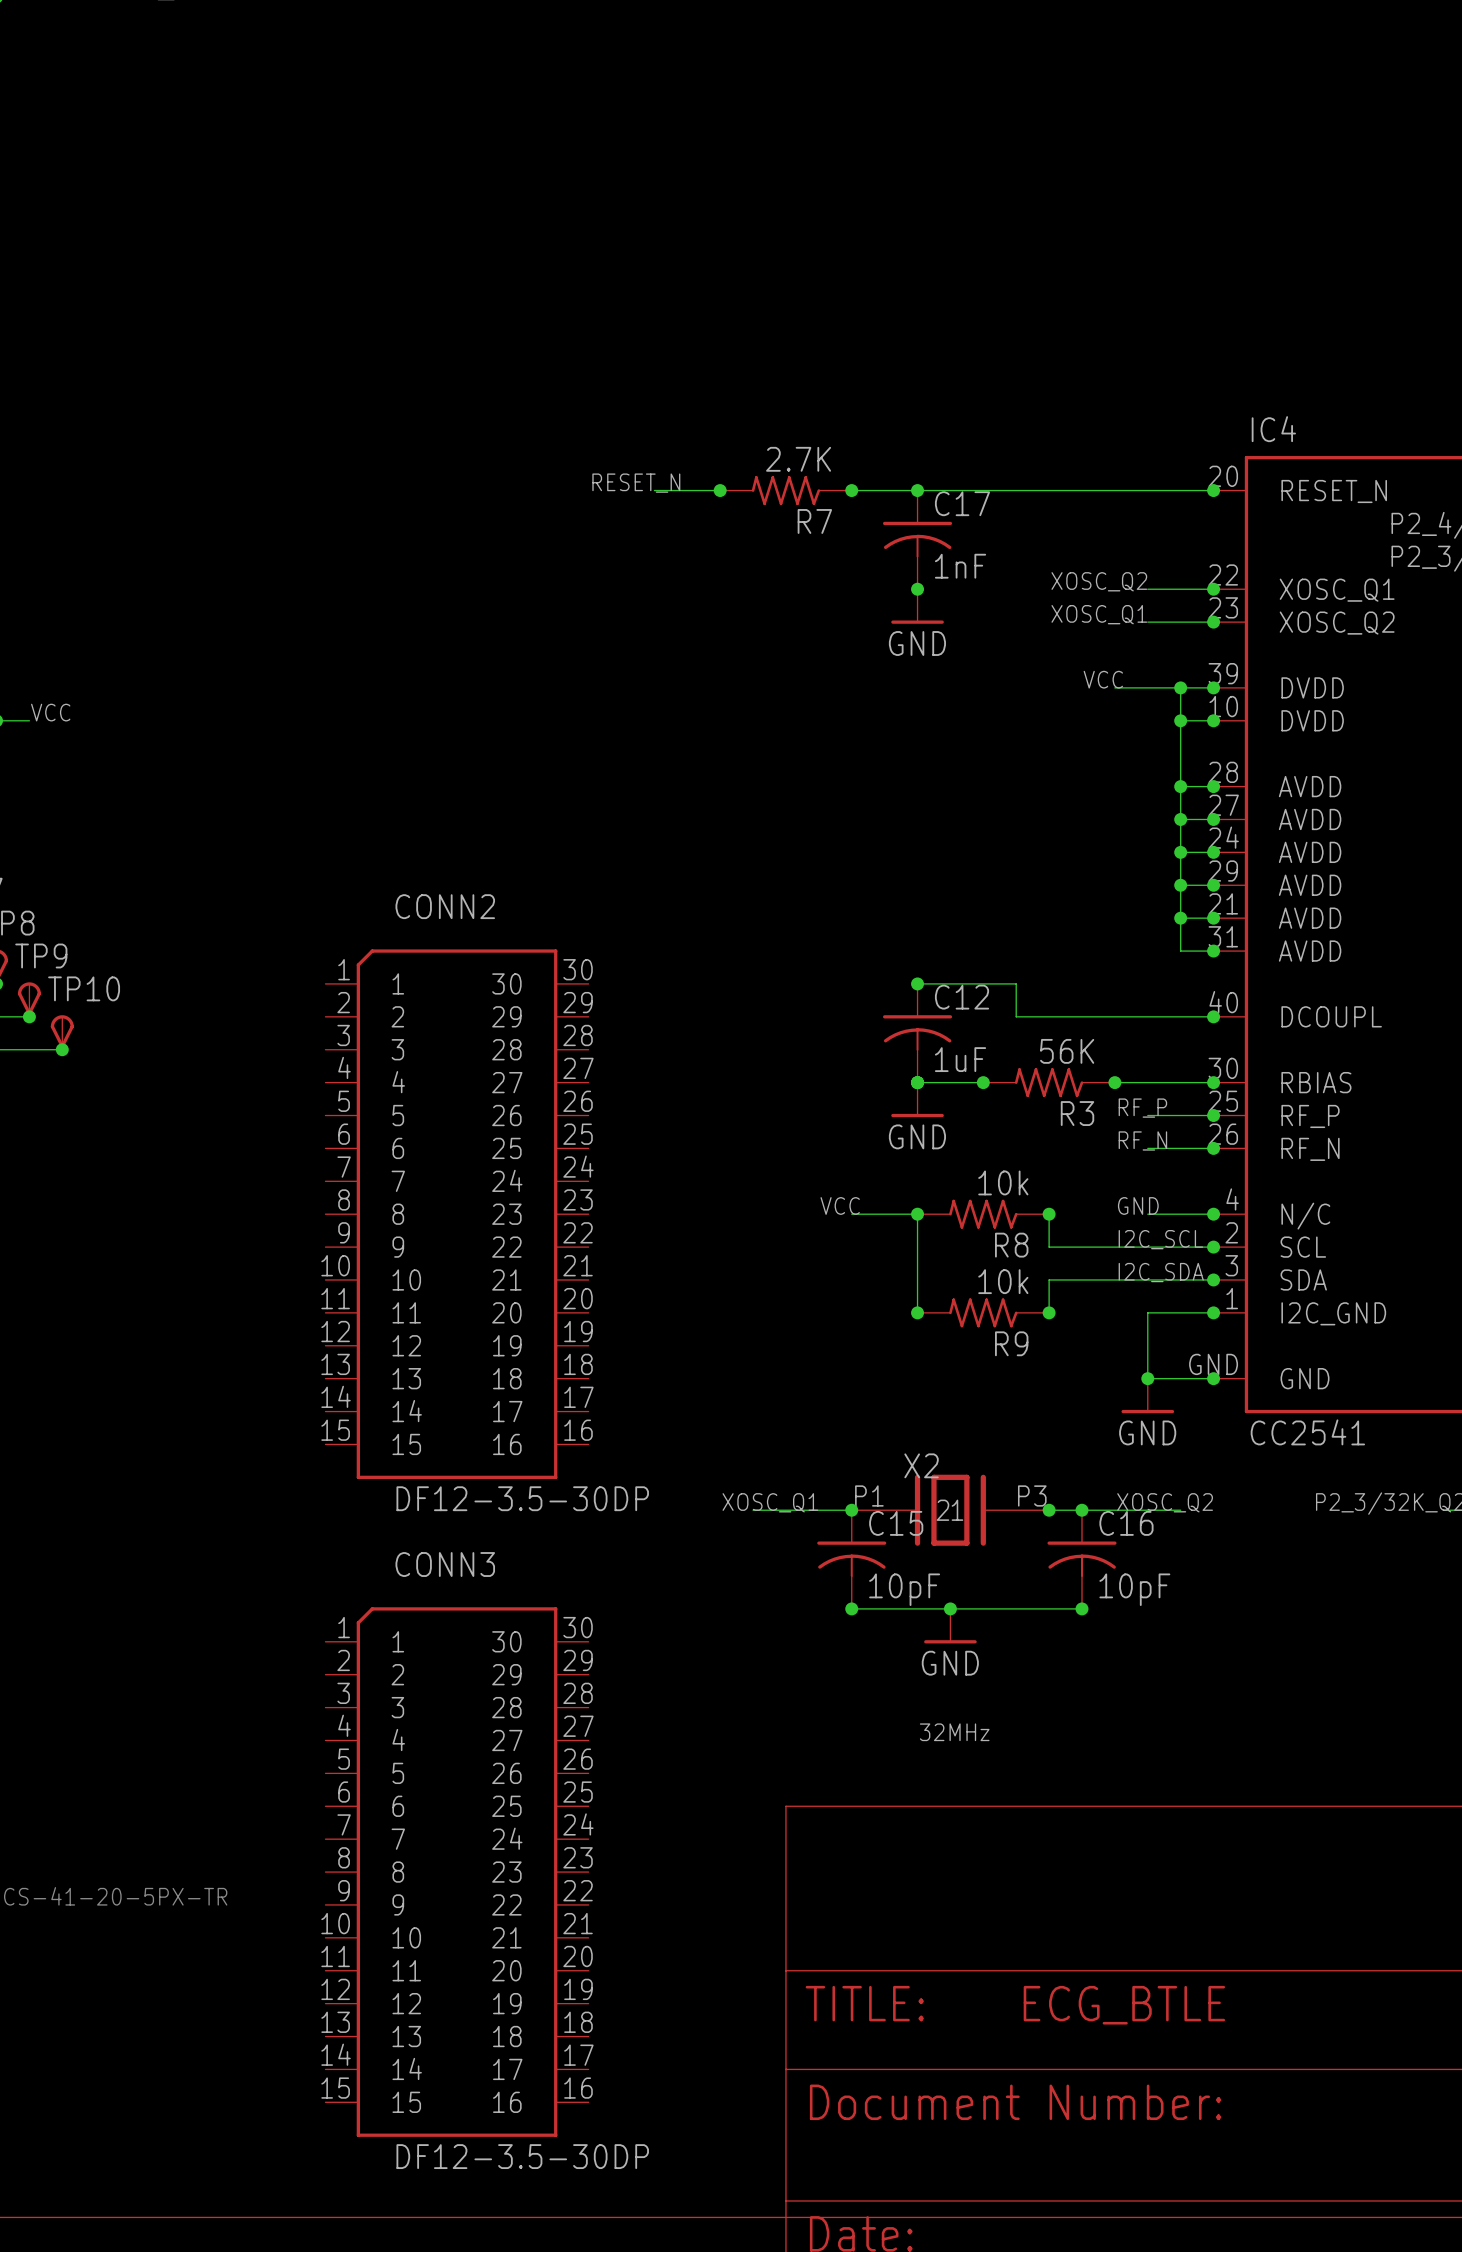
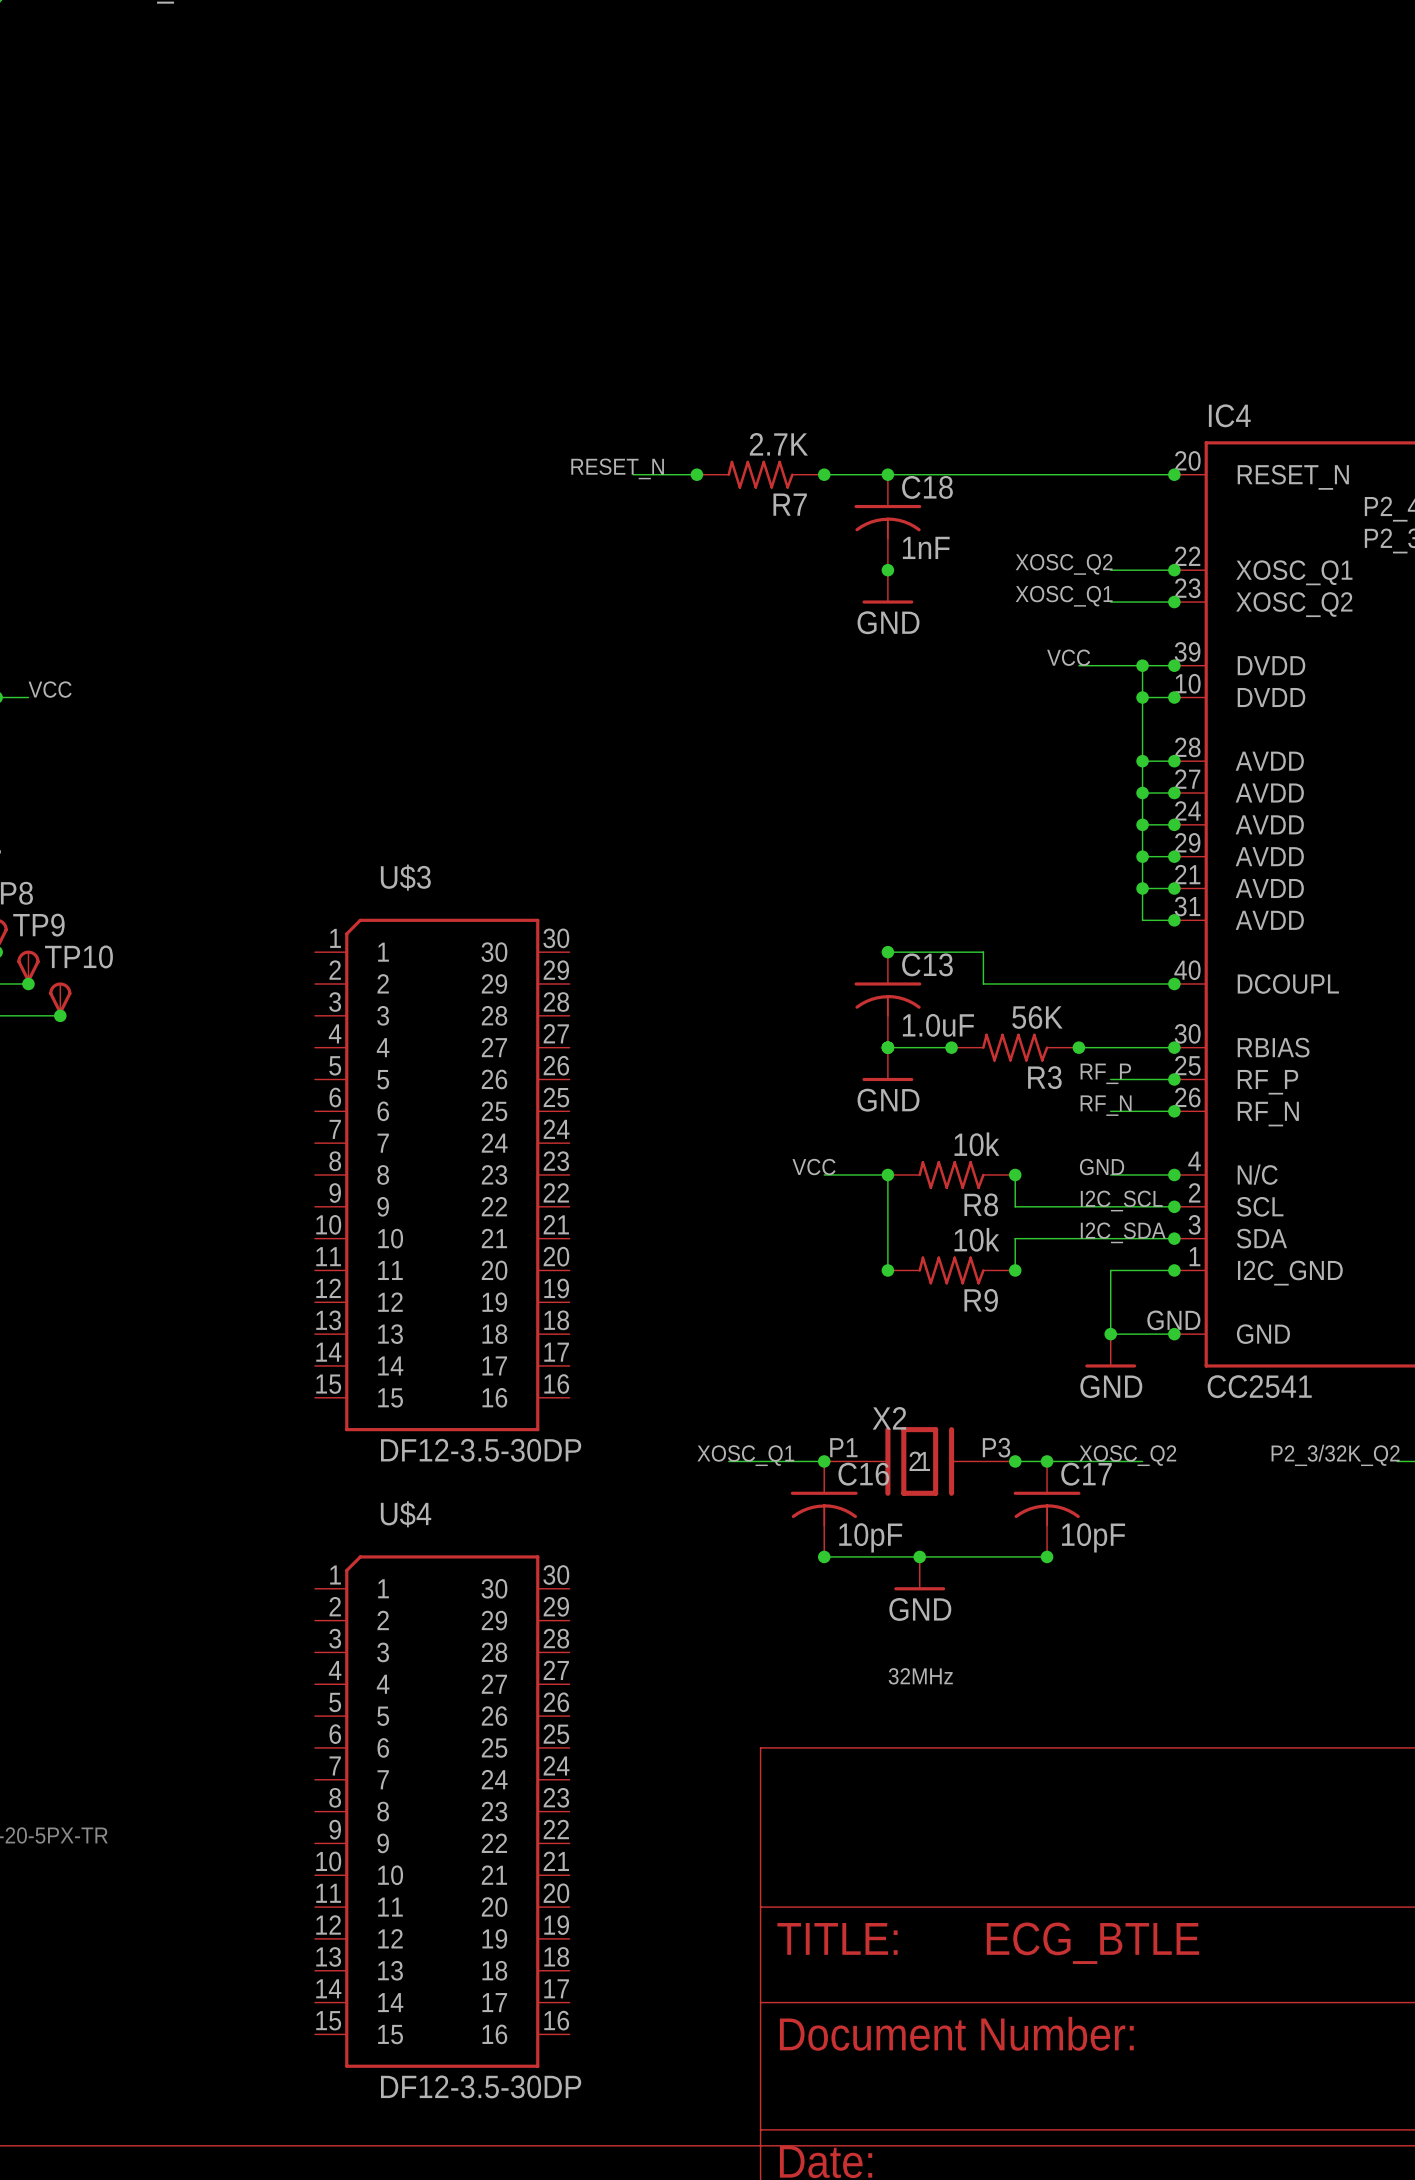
C17 name: C17 (962, 503) -> C18 (927, 487)
CONN2 name: CONN2 (445, 906) -> U$3 (405, 877)
C12 name: C12 (962, 997) -> C13 (927, 964)
C12 value: 1uF (960, 1059) -> 1.0uF (938, 1025)
C15 name: C15 (896, 1523) -> C16 (863, 1474)
C16 name: C16 (1126, 1523) -> C17 (1086, 1474)
CONN3 name: CONN3 (445, 1564) -> U$4 (406, 1514)

